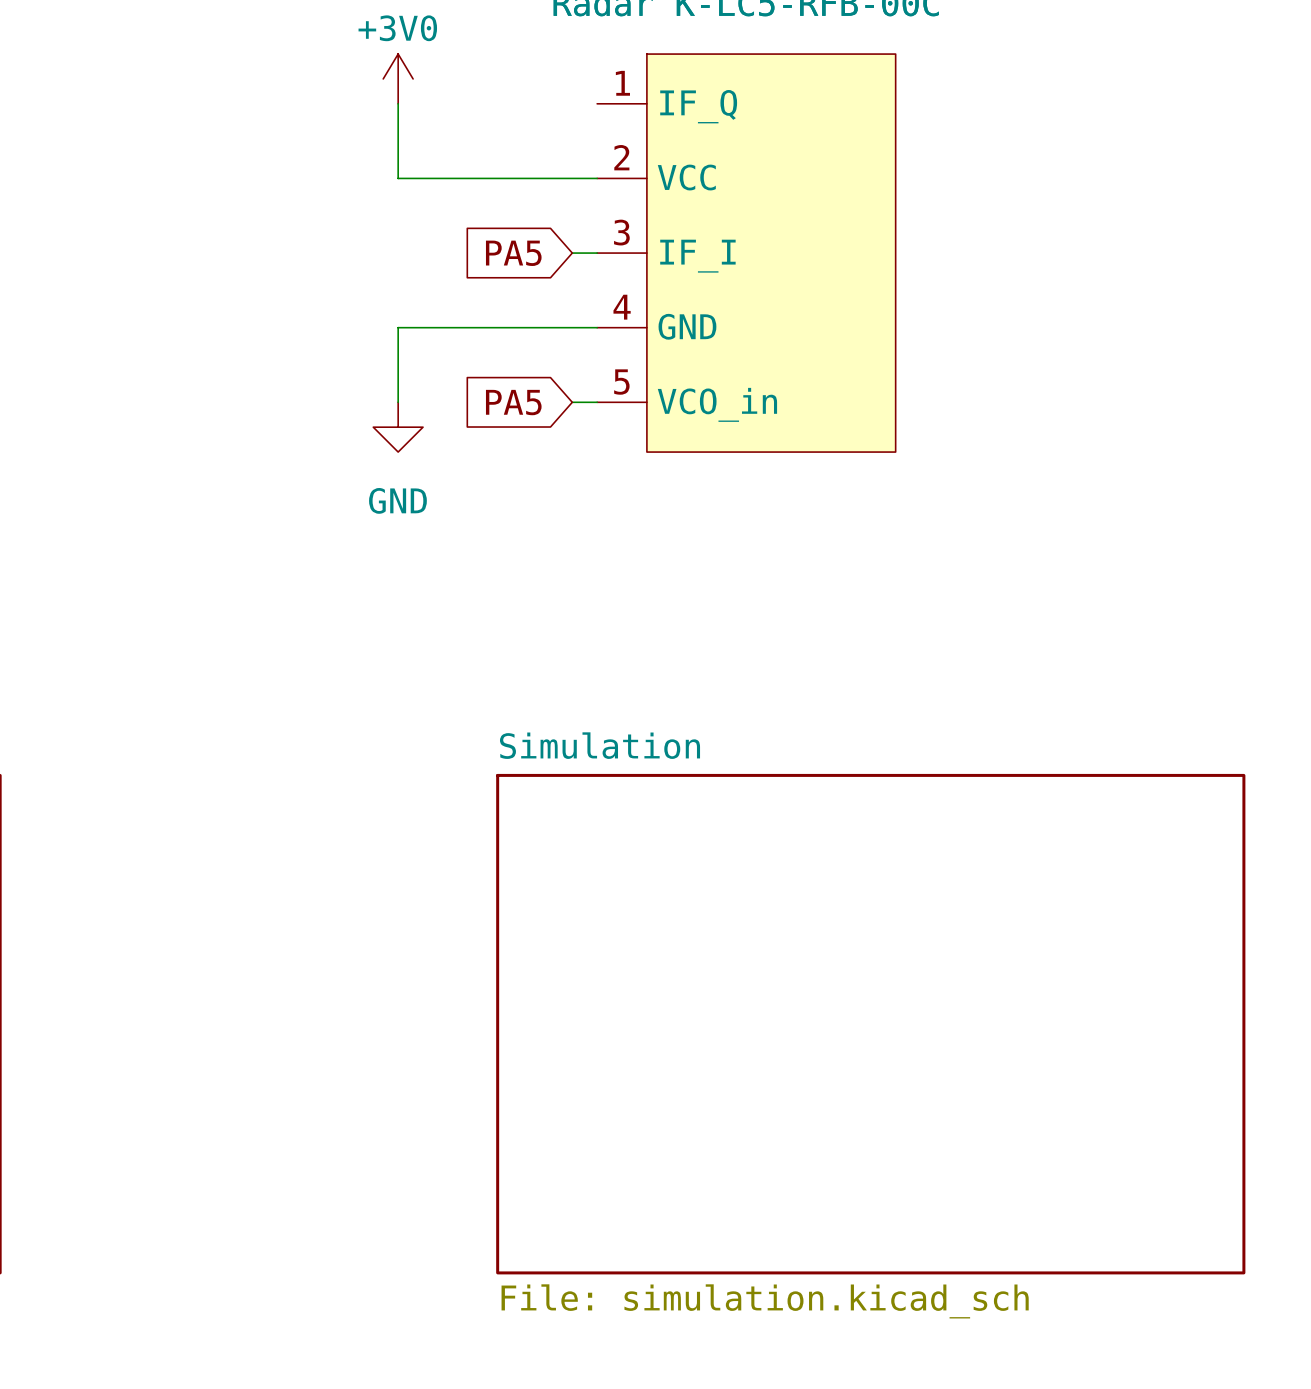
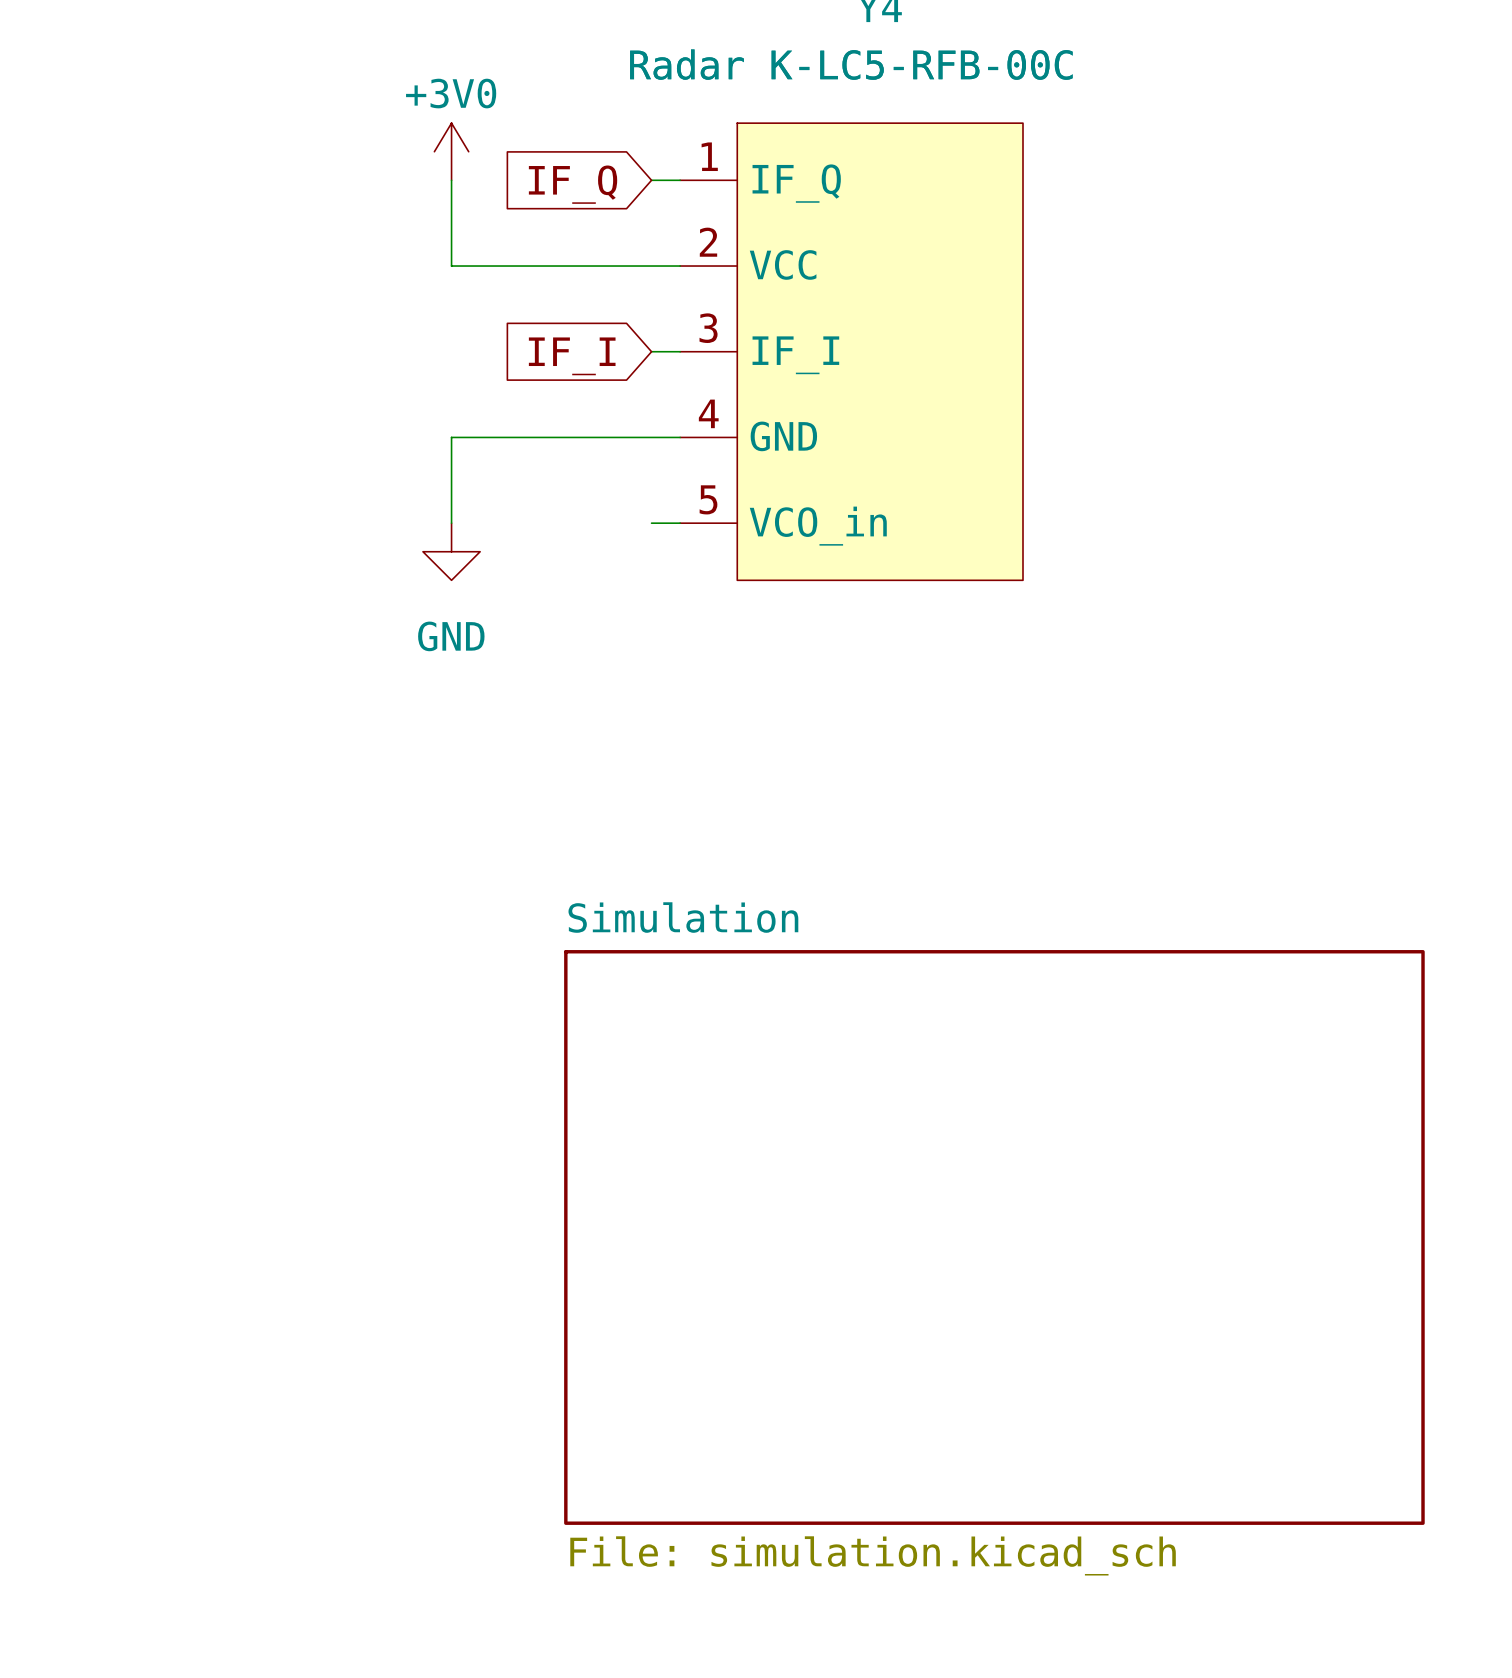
wire: none -> (651, 180) (680, 180)
global label: none -> IF_Q (573, 184)
global label: PA5 (513, 253) -> IF_I (572, 356)
global label: PA5 (513, 402) -> none

